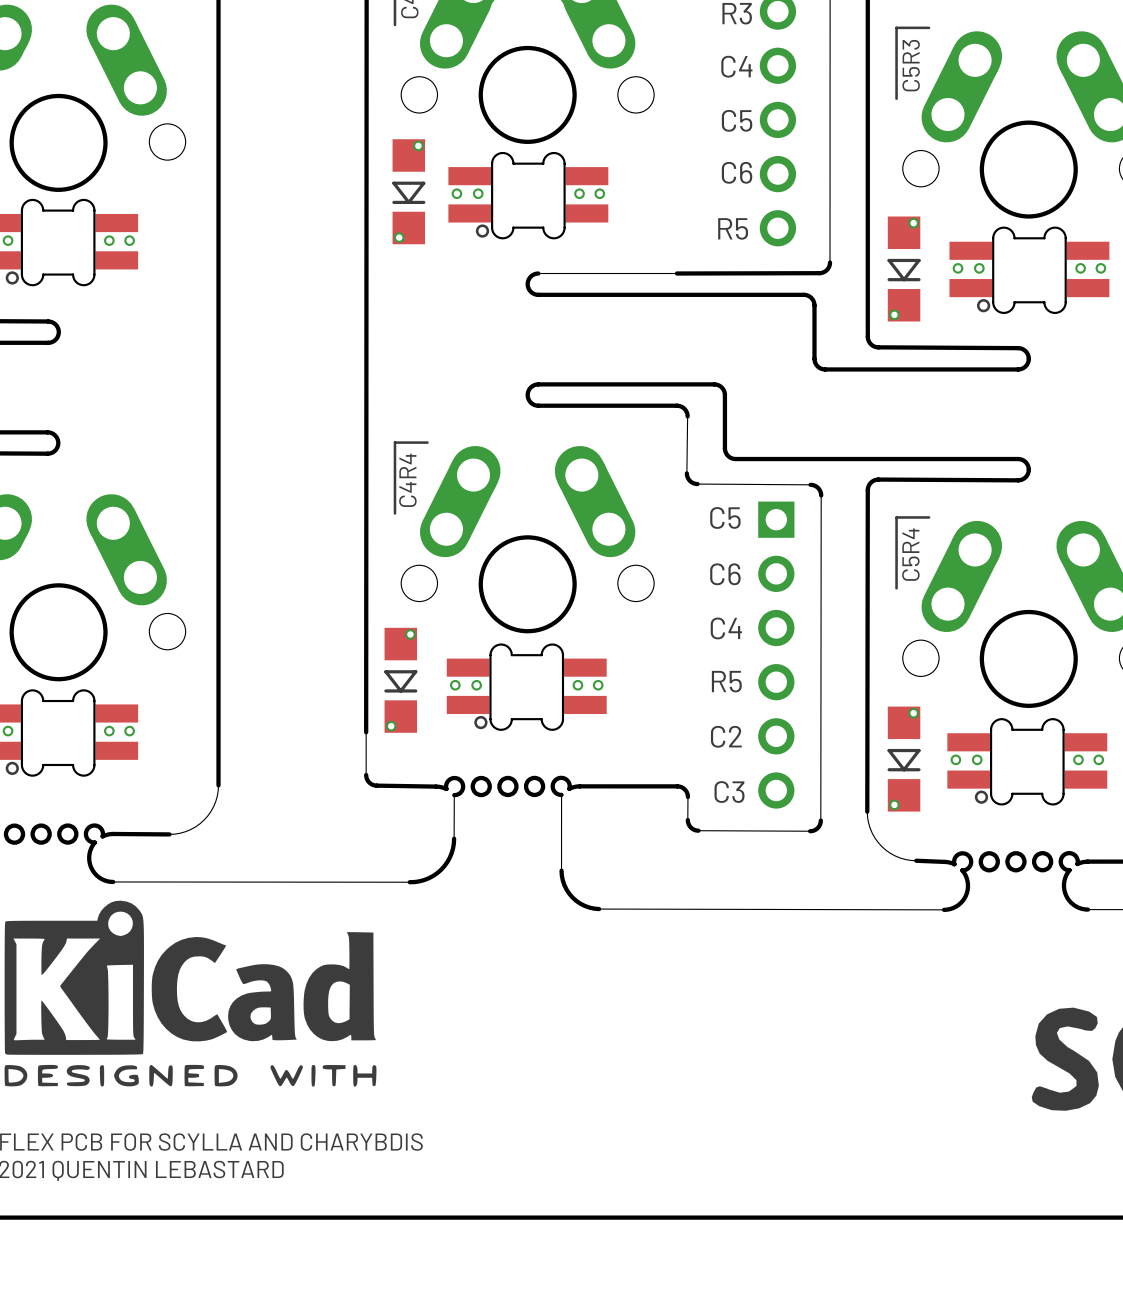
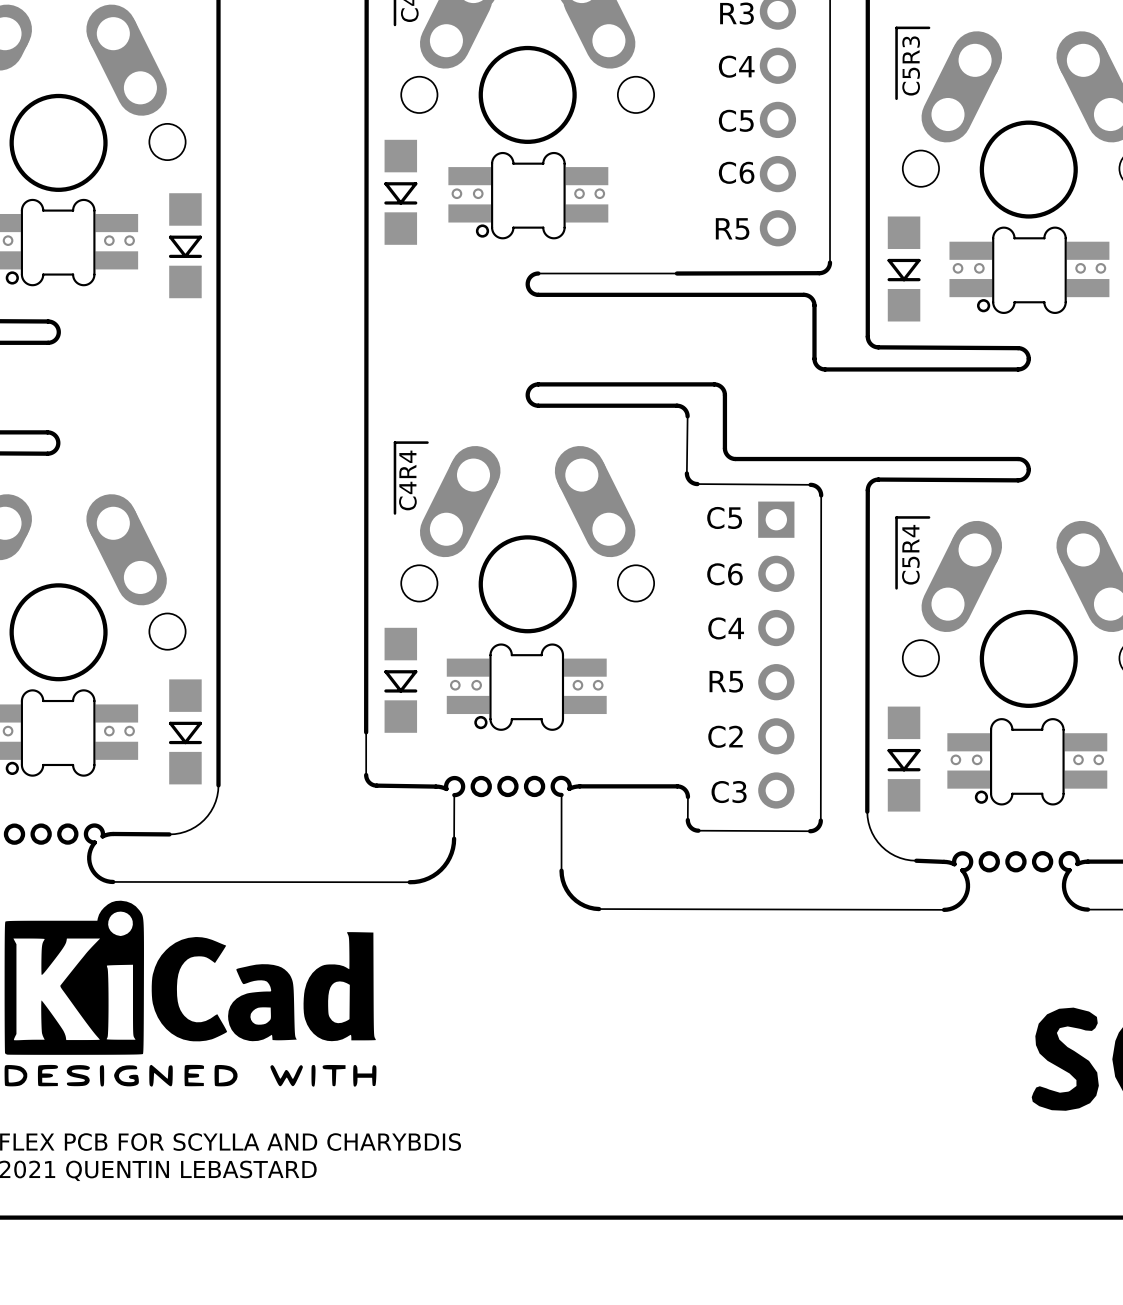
part footprint: [392, 139, 426, 245] -> [384, 139, 418, 245]
part footprint: [887, 216, 921, 322] -> [887, 216, 921, 322]
part: none -> (185, 245)
part footprint: [384, 627, 418, 733] -> [384, 627, 418, 733]
part footprint: [887, 706, 921, 812] -> [887, 706, 921, 812]
part: none -> (185, 731)

